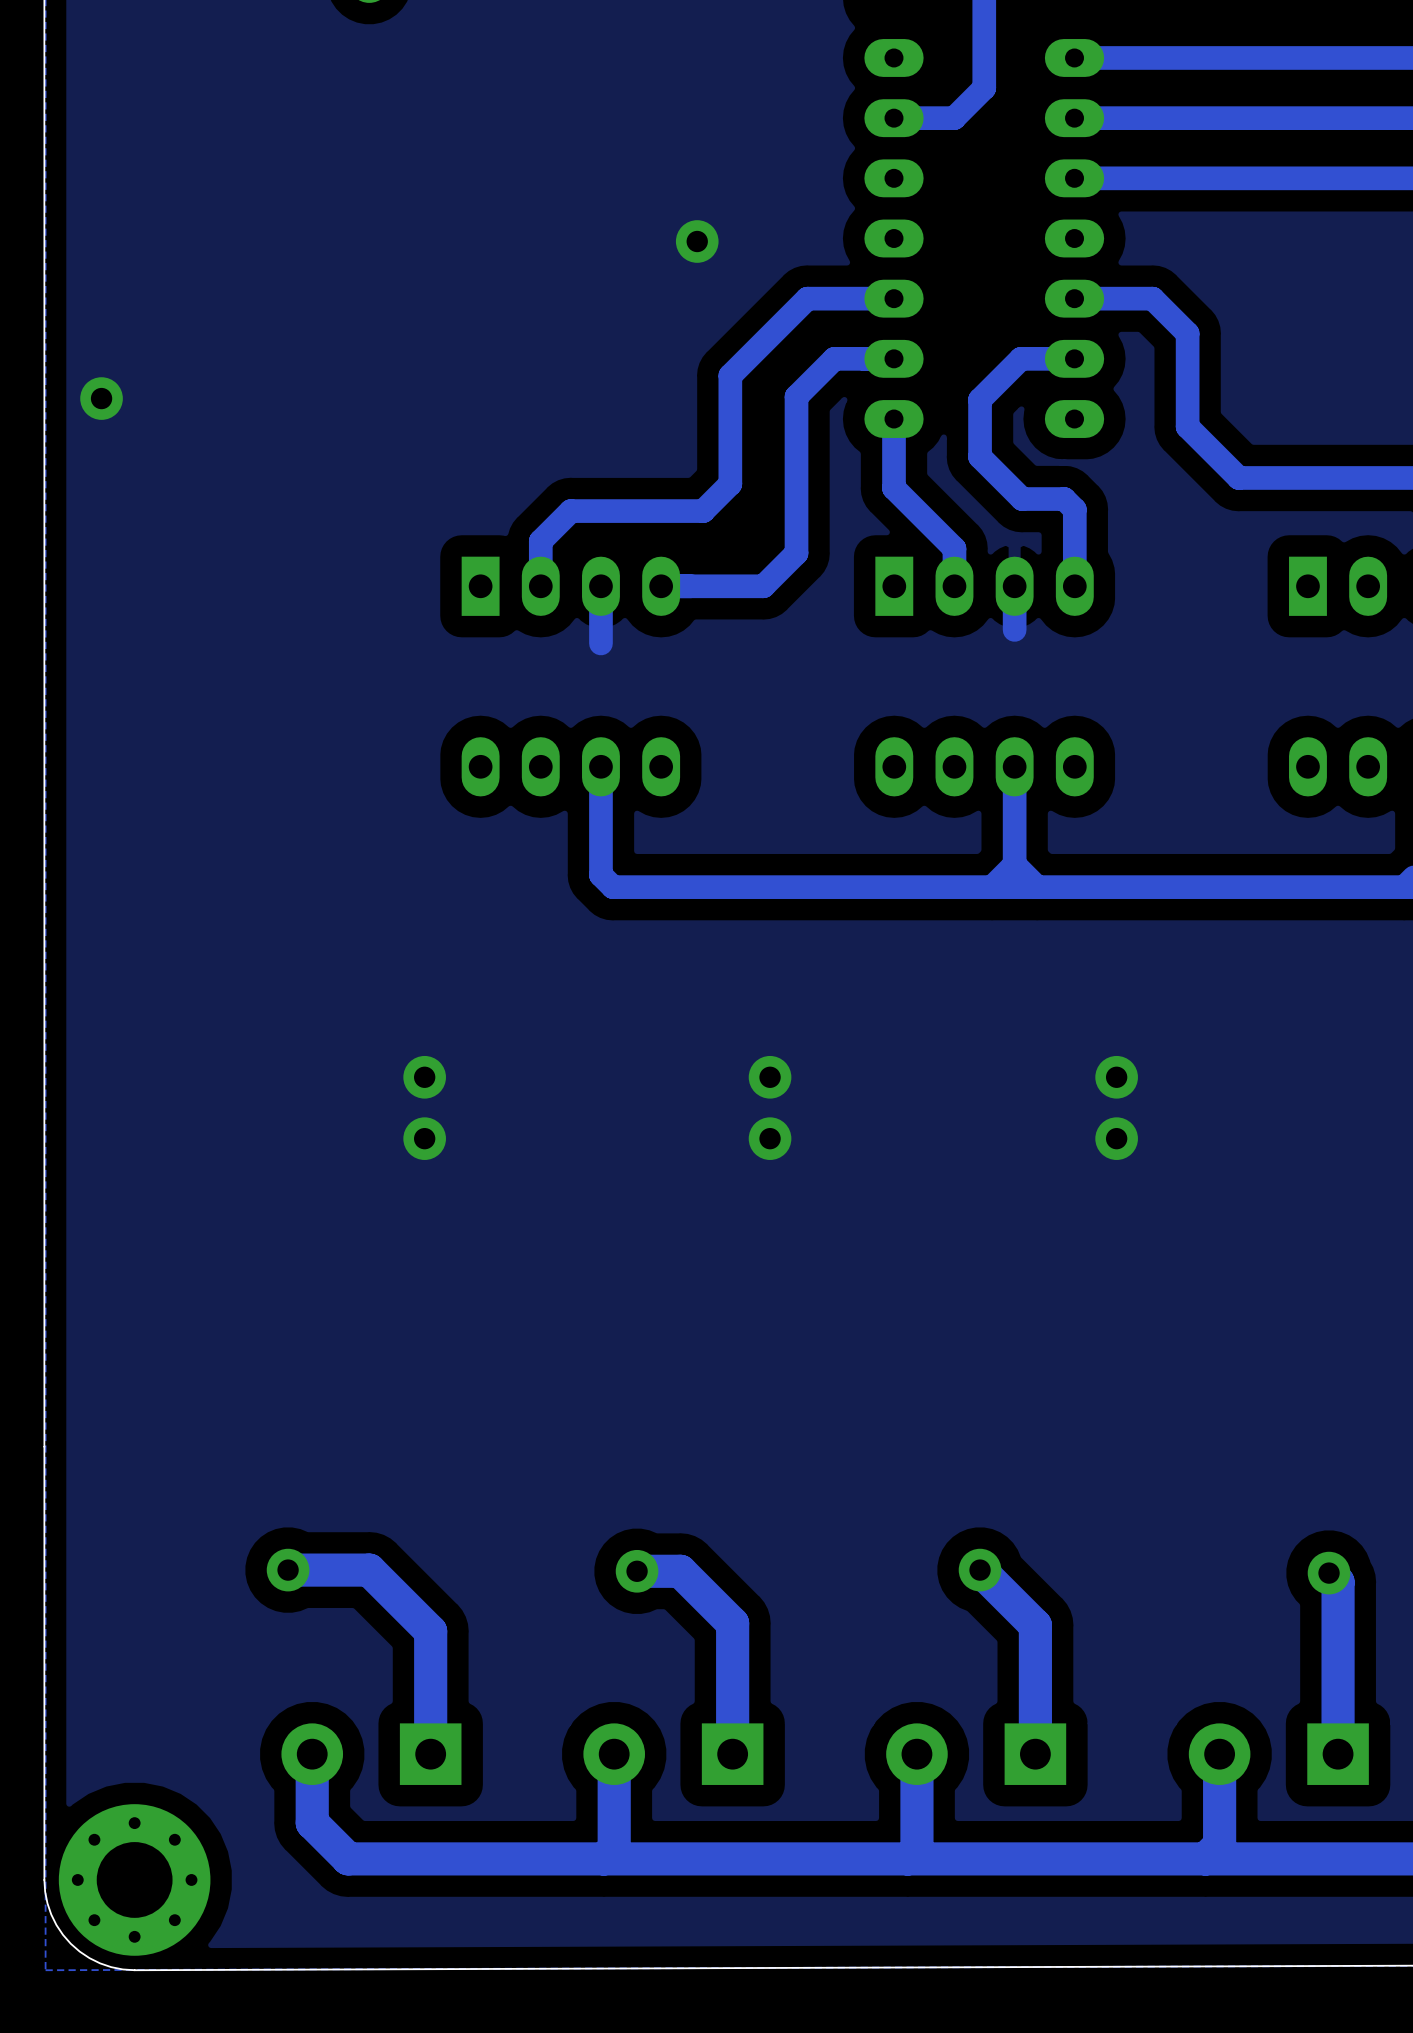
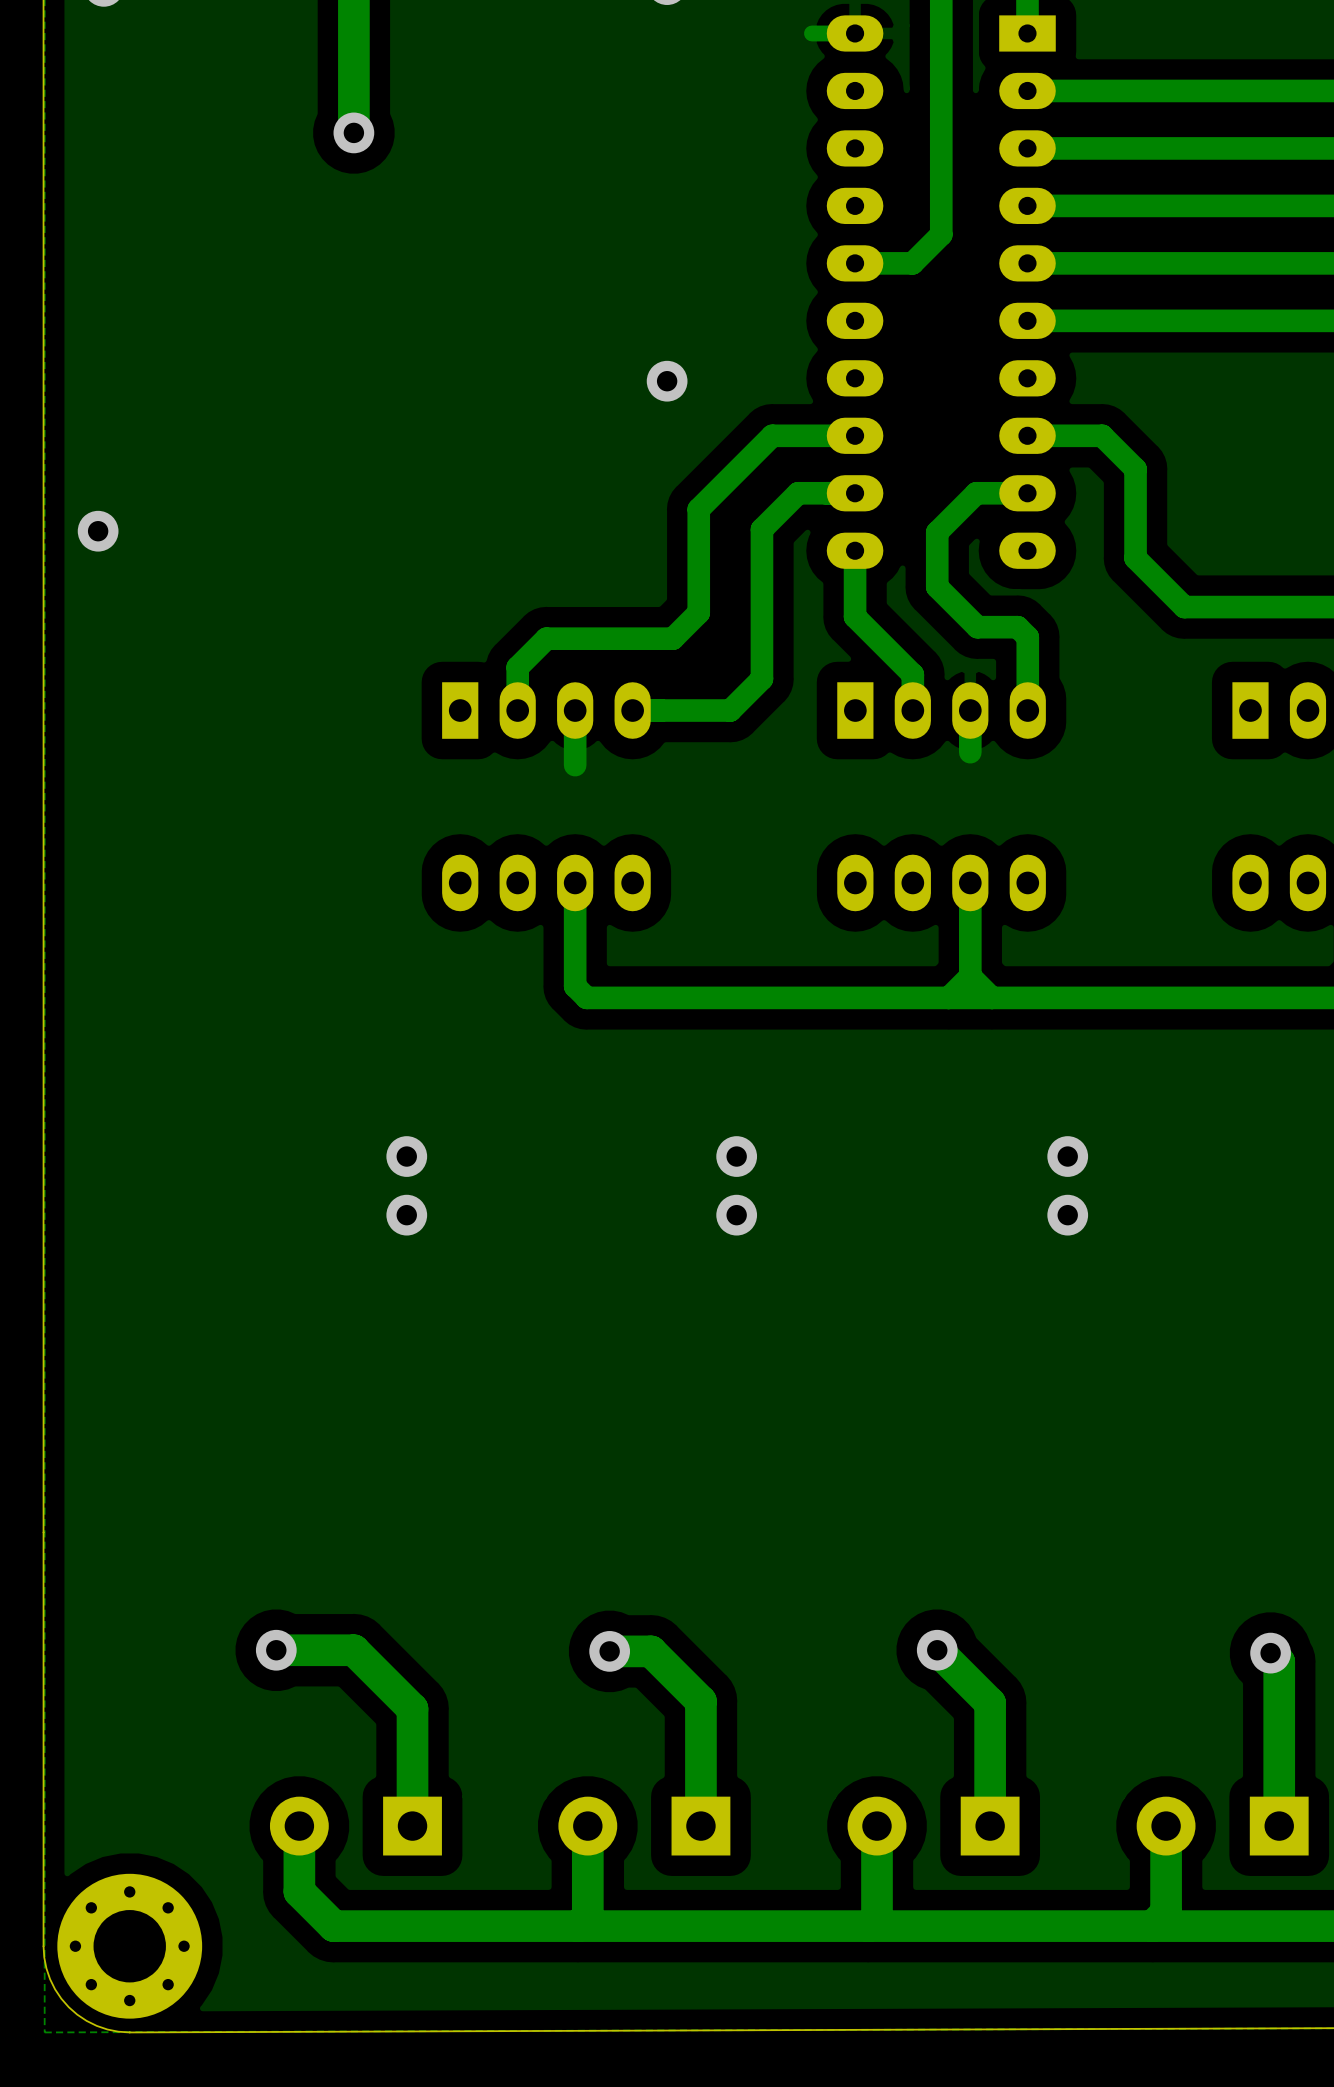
via: none -> (406, 1156)
via: none -> (736, 1156)
via: none -> (1067, 1156)
via: (424, 1077) -> none
via: (770, 1077) -> none
via: (1116, 1077) -> none
via: none -> (406, 1215)
via: none -> (736, 1215)
via: none -> (1067, 1215)
via: (424, 1138) -> none
via: (770, 1138) -> none
via: (1116, 1138) -> none

